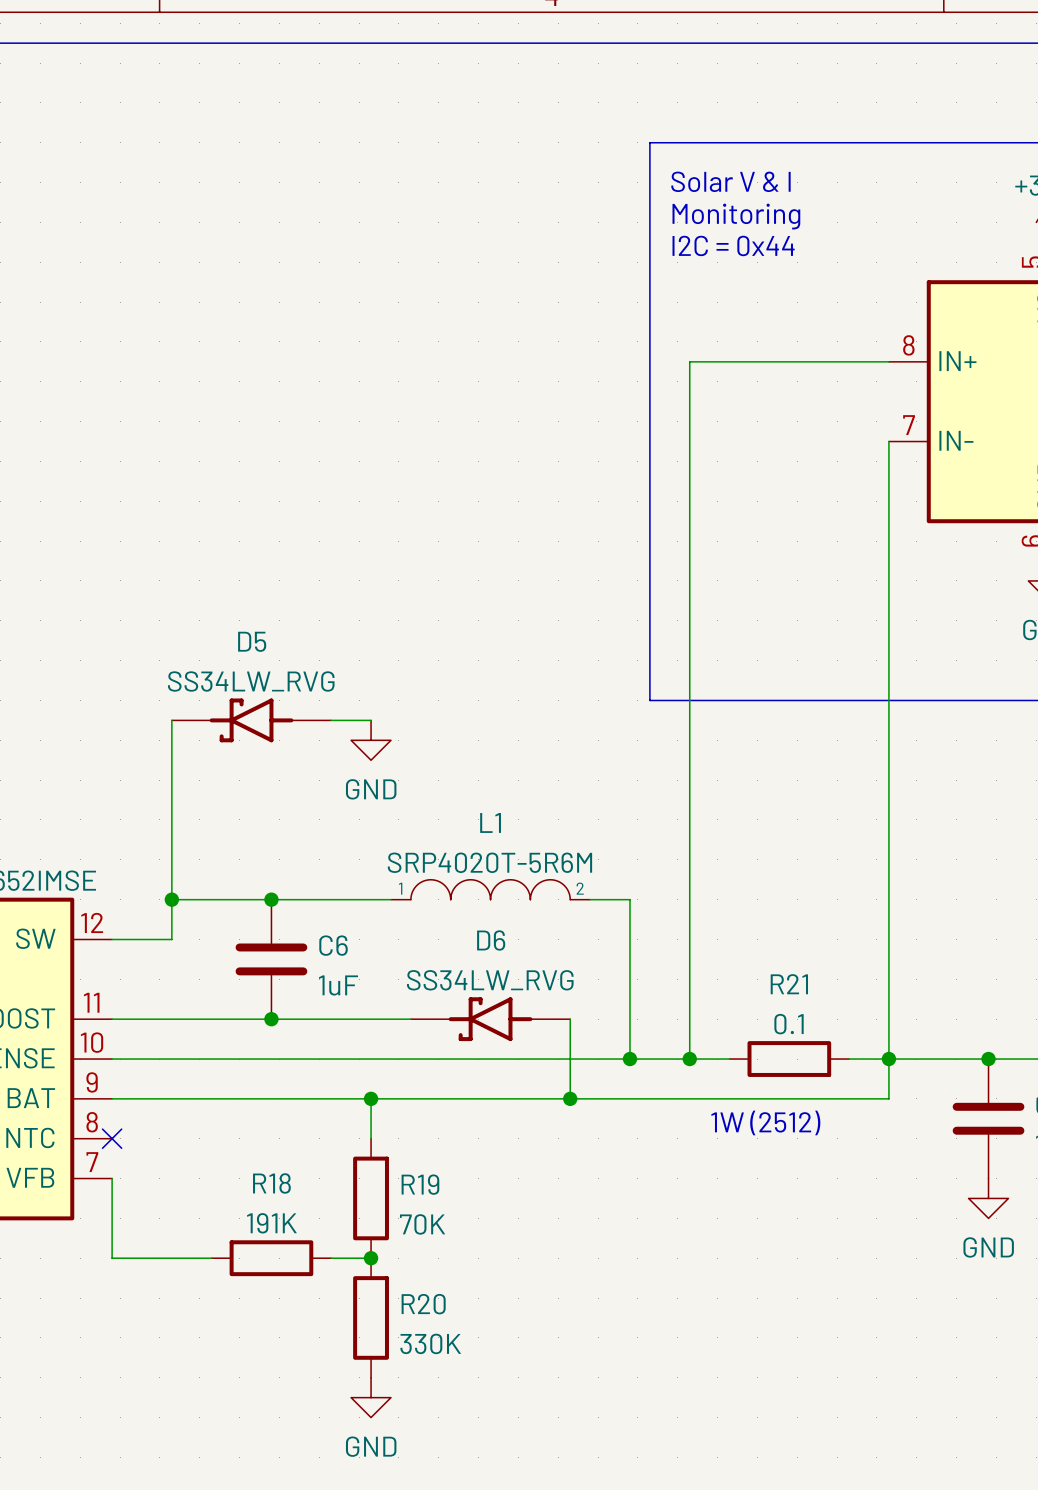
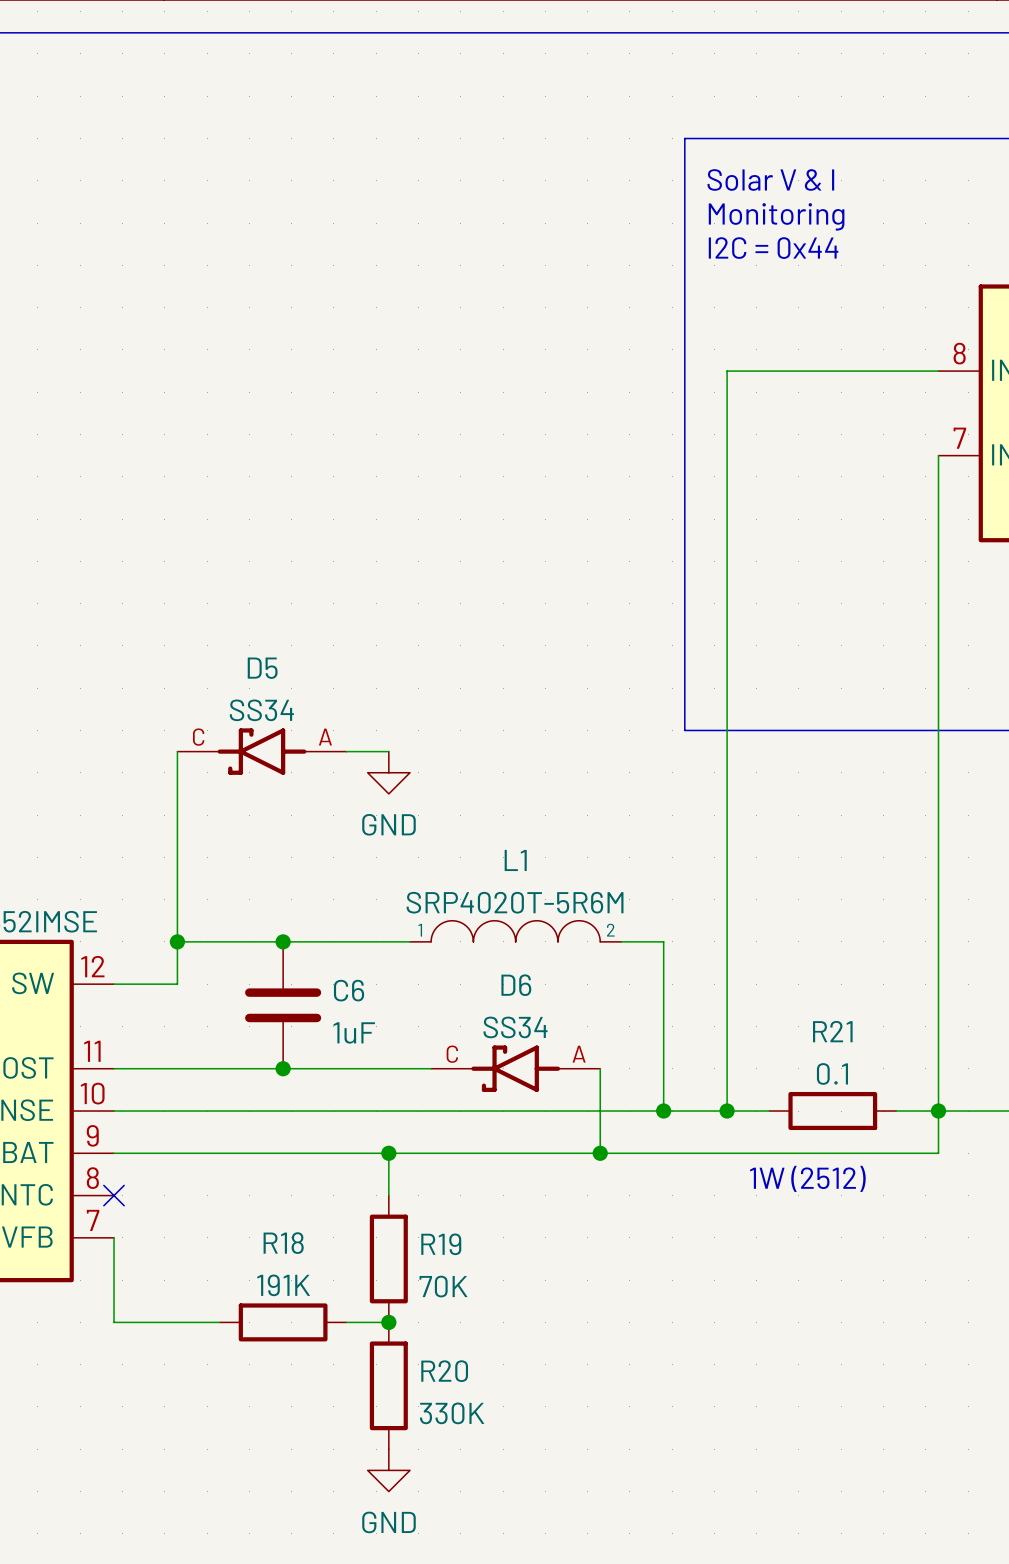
D5 value: SS34LW_RVG (251, 681) -> SS34 (261, 710)
D5 pin number: none -> C (198, 737)
D5 pin number: none -> A (325, 737)
D6 value: SS34LW_RVG (490, 980) -> SS34 (515, 1027)
D6 pin number: none -> C (452, 1054)
D6 pin number: none -> A (579, 1054)

